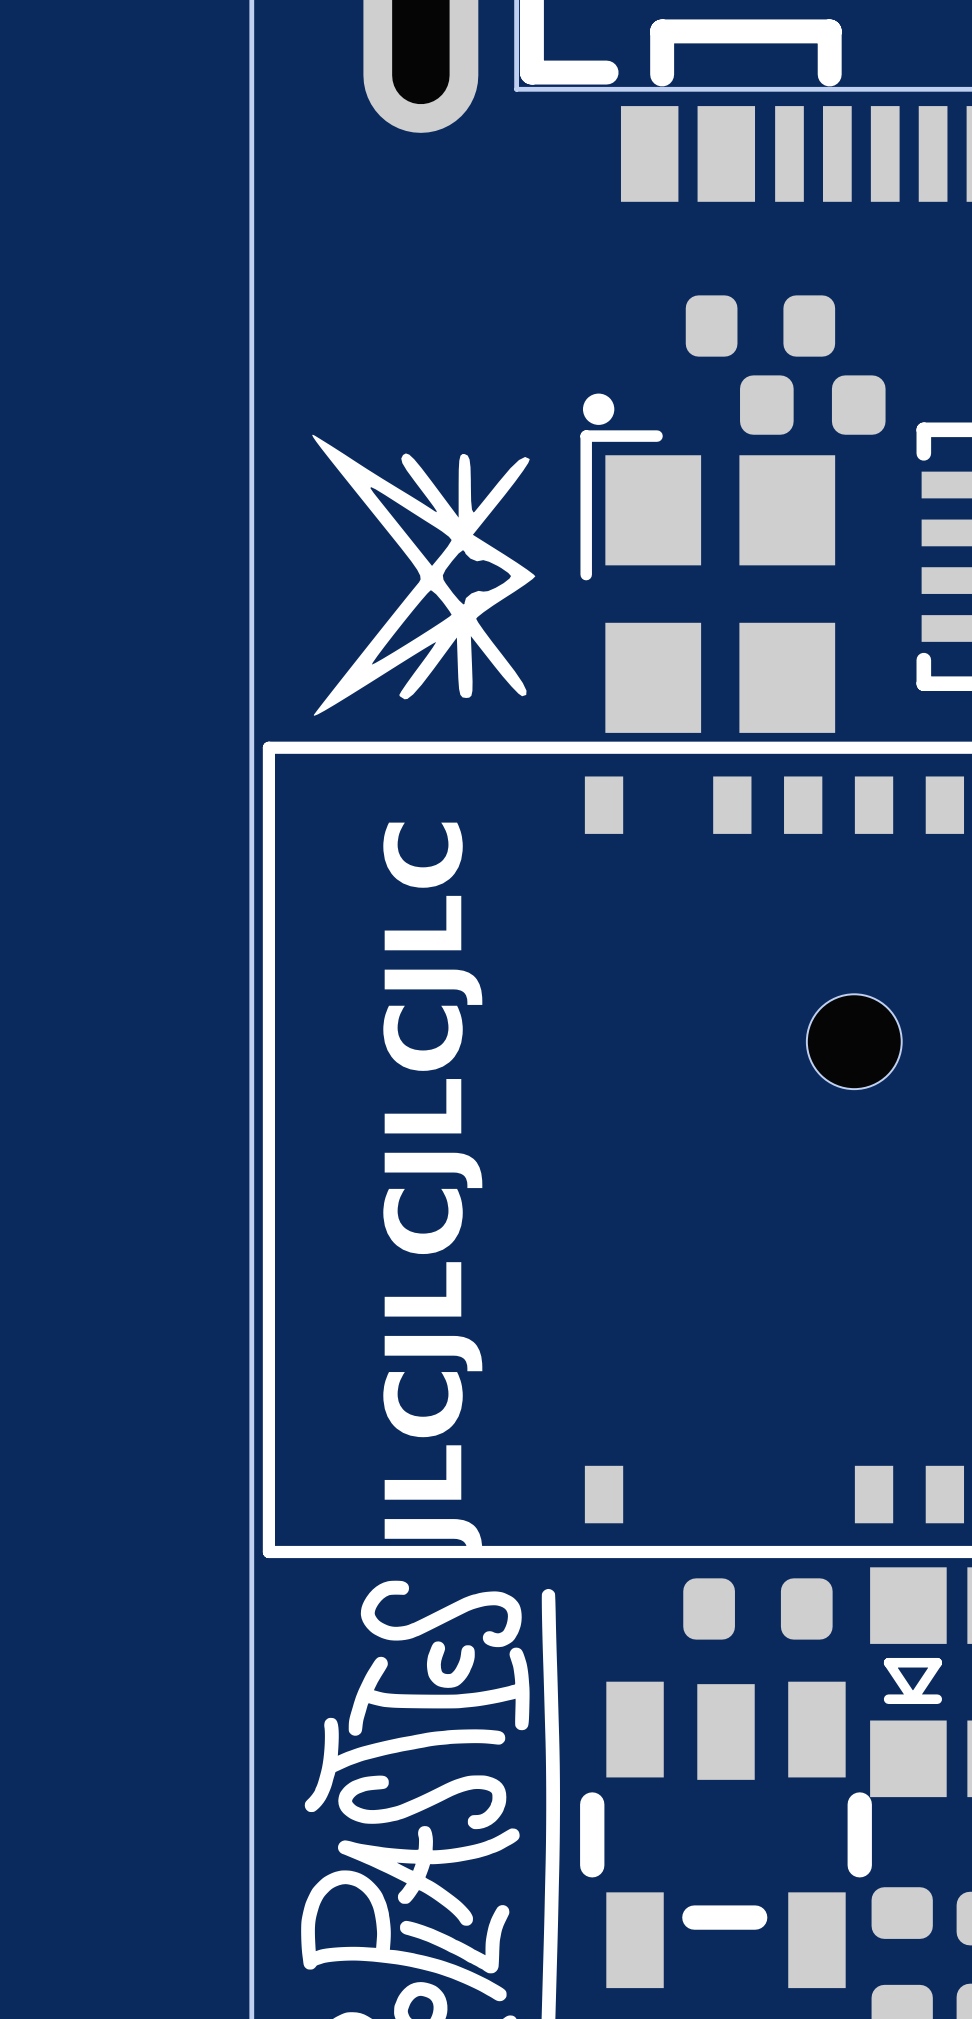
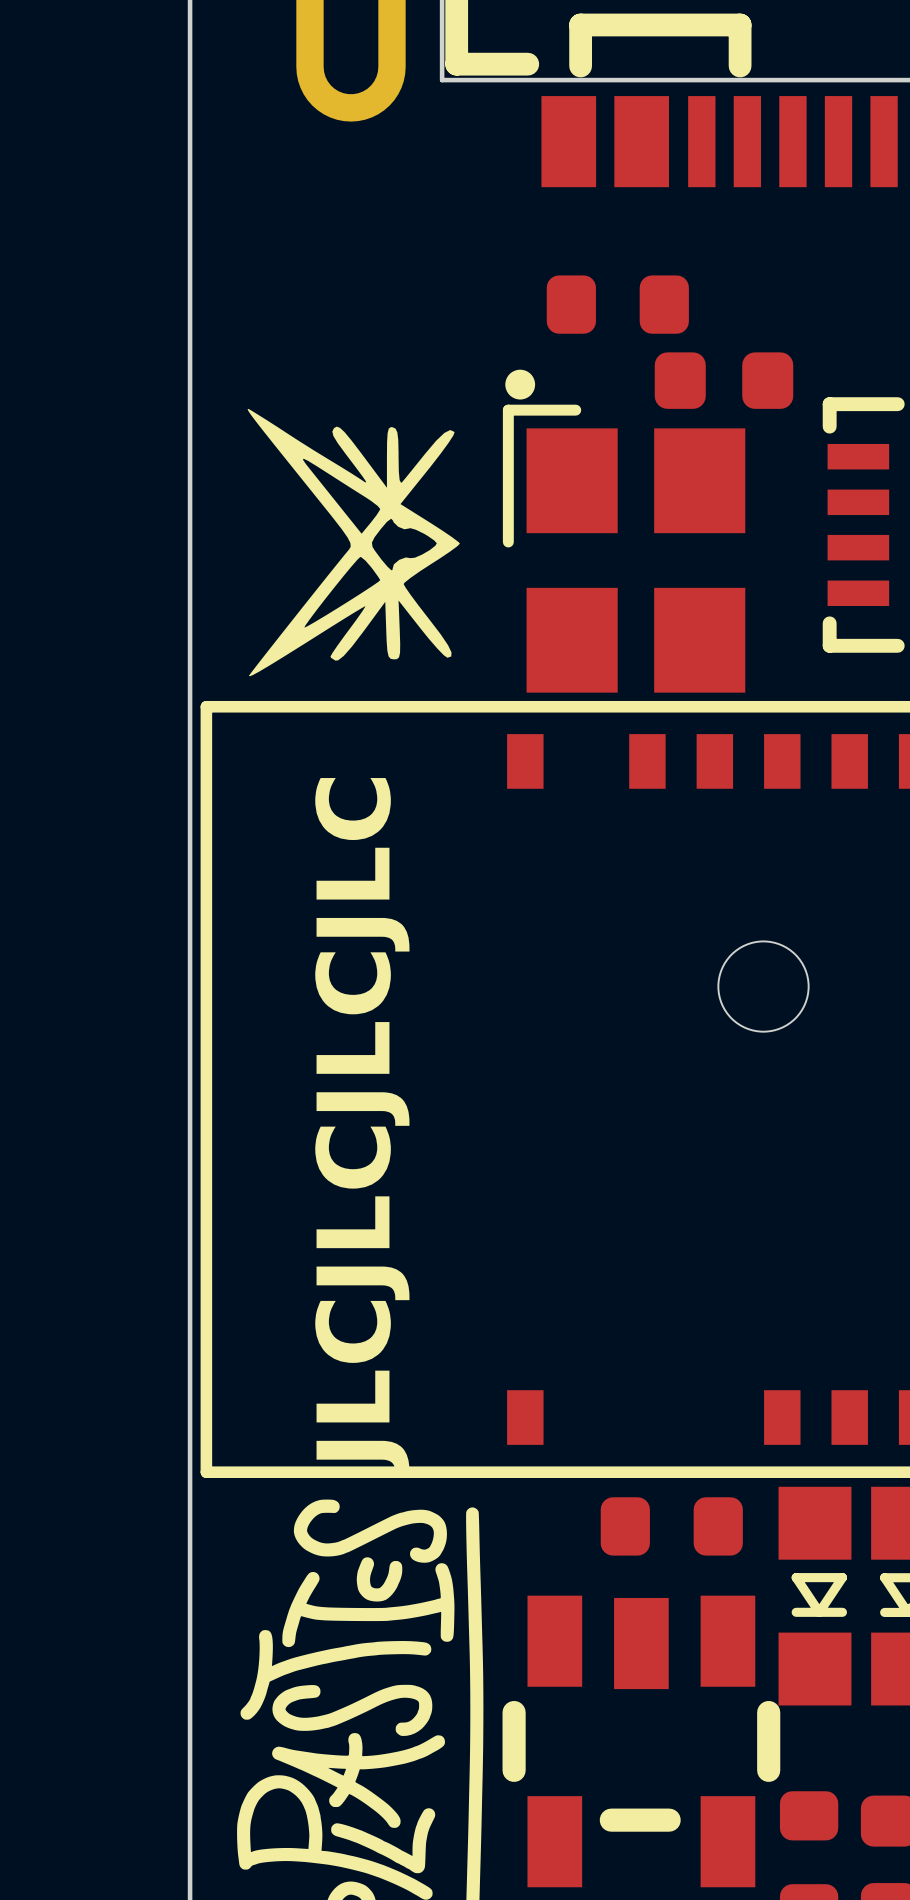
part position: (760, 326) -> (617, 304)

